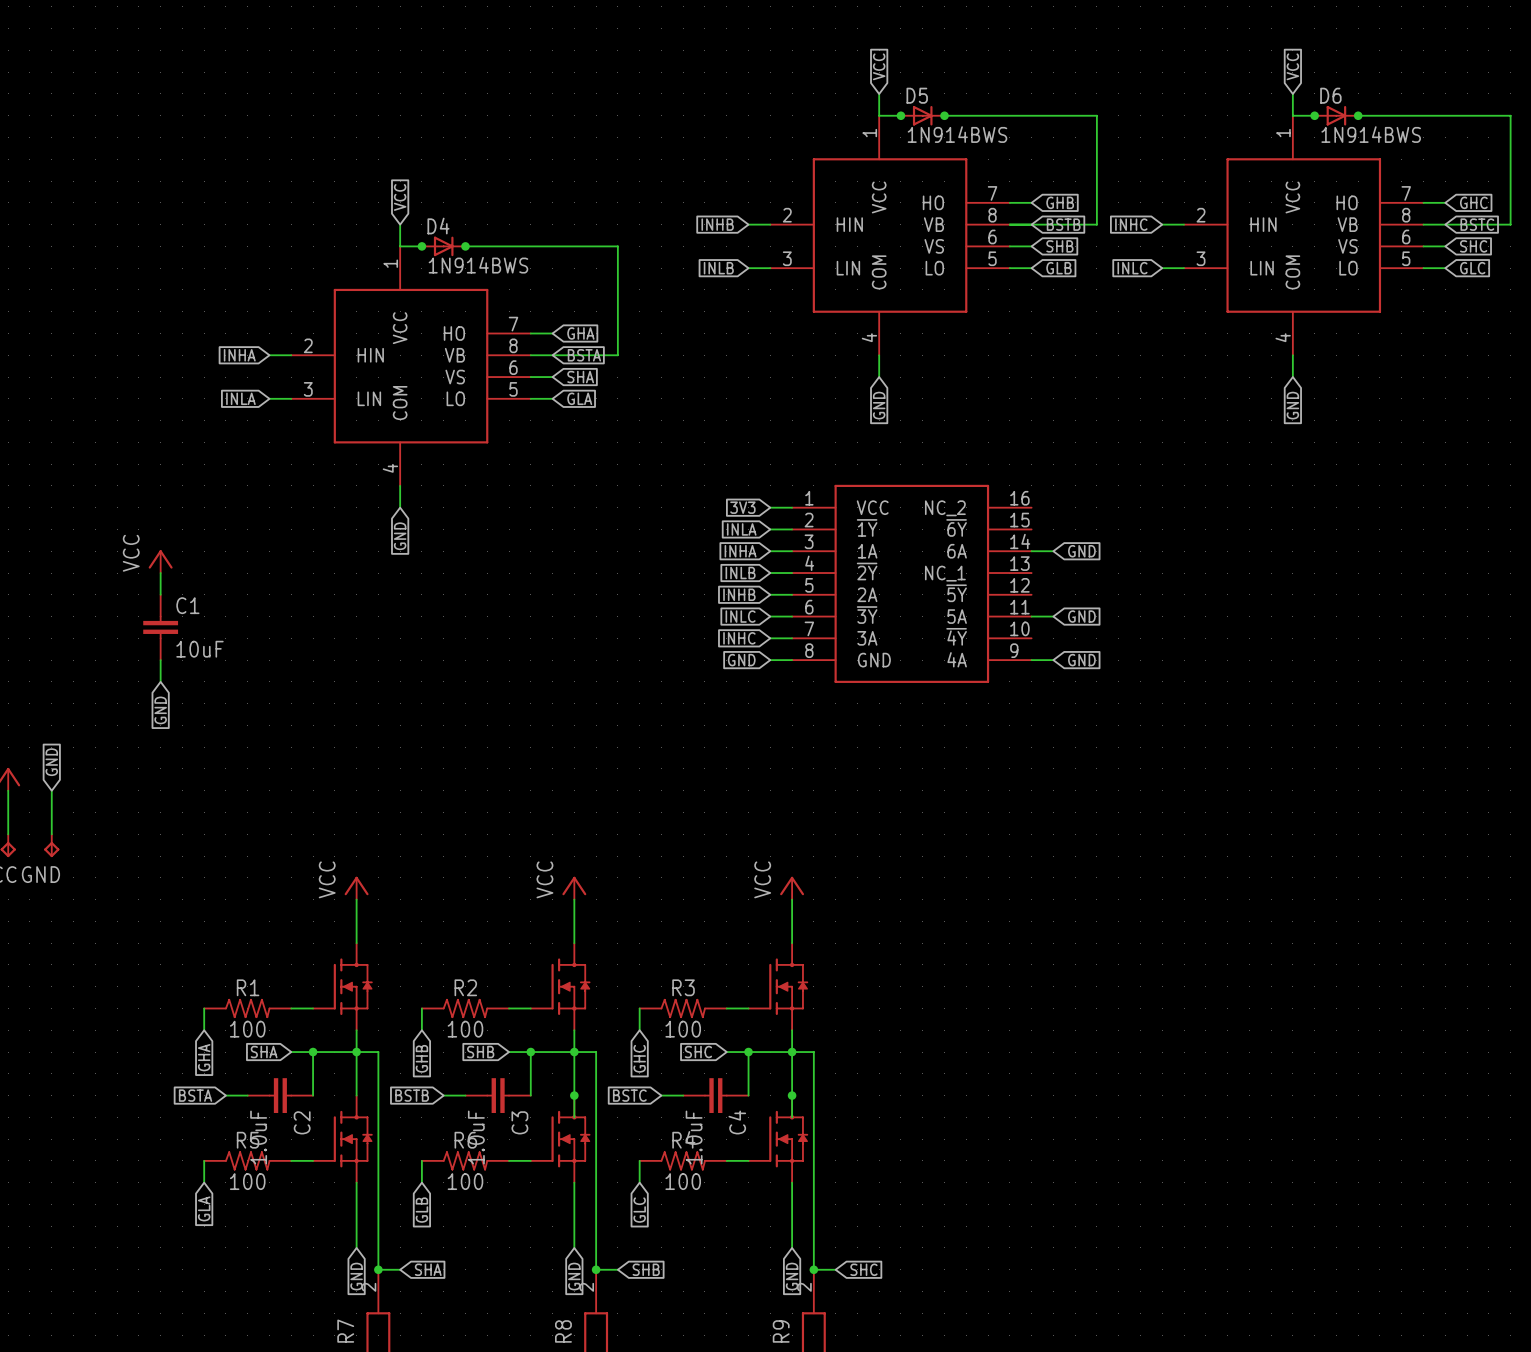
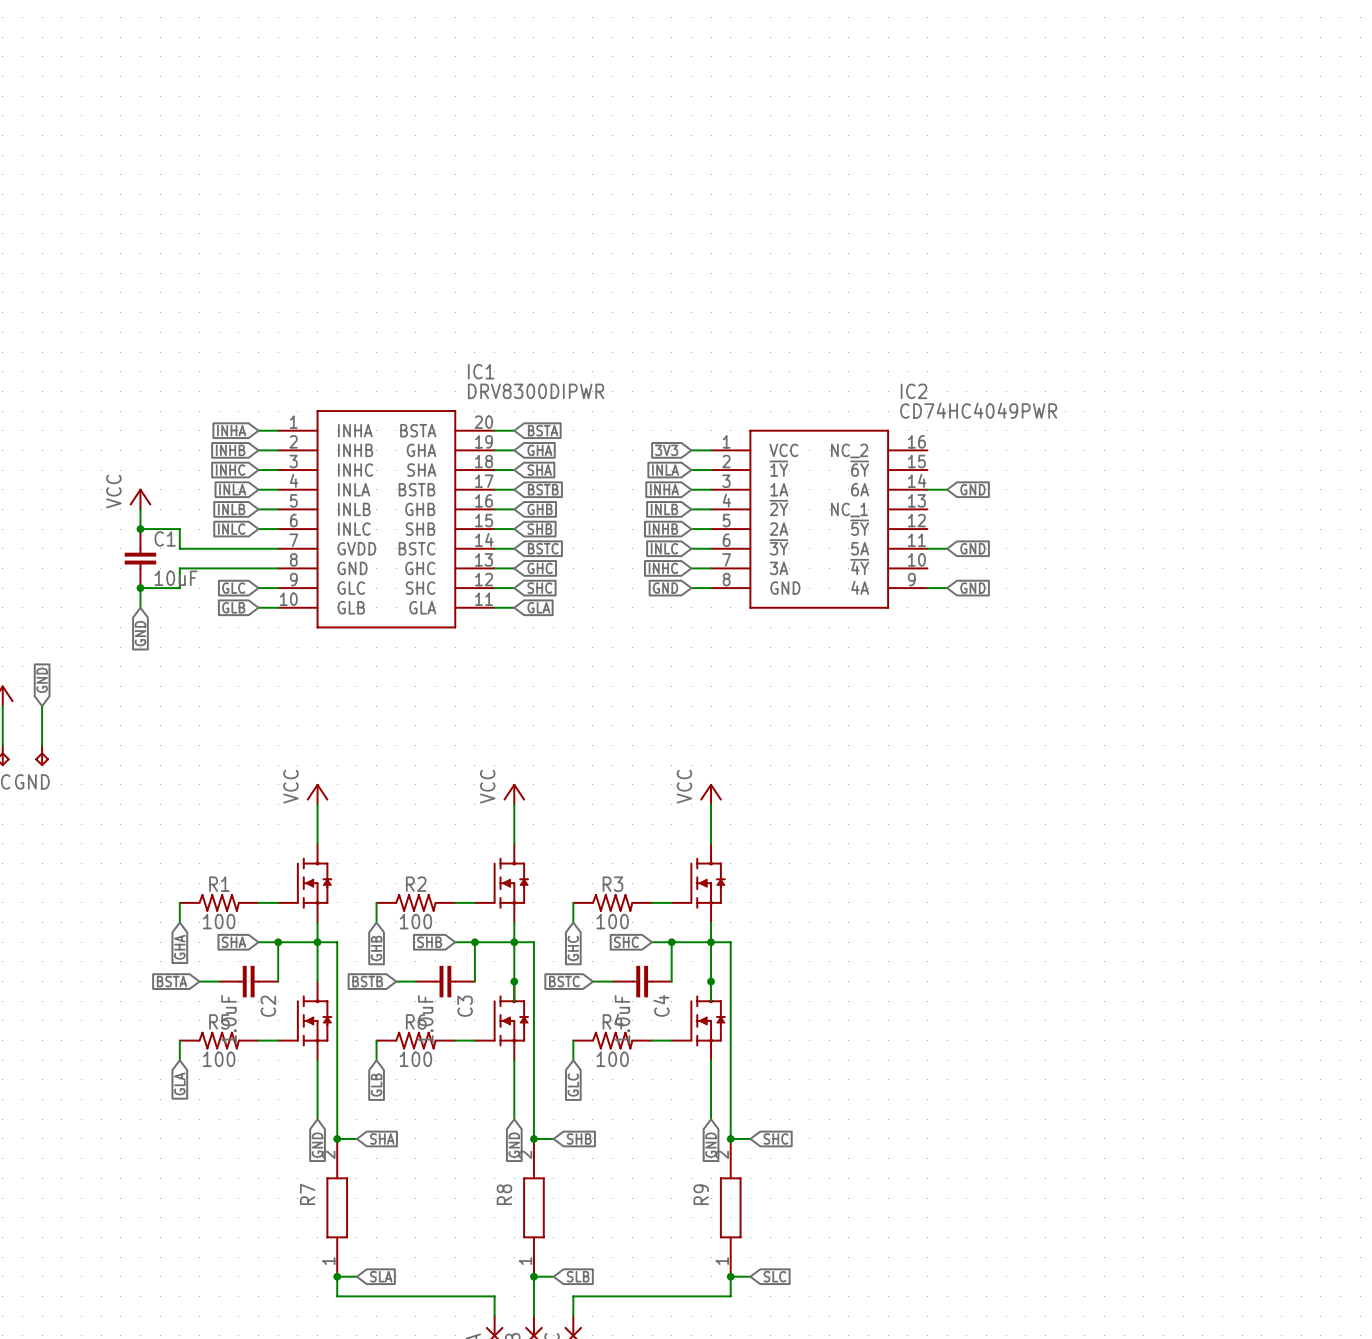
global label: VCC (879, 66) -> none
global label: VCC (1292, 66) -> none
wire: (879, 93) (879, 115) (900, 115) -> none
wire: (1292, 93) (1292, 115) (1314, 115) -> none
junction: (900, 115) -> none
D5: 1N914BWS (922, 115) -> none
wire: (944, 115) (1096, 115) (1096, 224) (1009, 224) -> none
junction: (944, 115) -> none
junction: (1314, 115) -> none
D6: 1N914BWS (1336, 115) -> none
wire: (1358, 115) (1510, 115) (1510, 224) (1423, 224) -> none
junction: (1358, 115) -> none
global label: VCC (400, 197) -> none
wire: (1009, 202) (1031, 202) -> none
global label: GHB (1060, 202) -> none
wire: (1423, 202) (1445, 202) -> none
global label: GHC (1473, 202) -> none
wire: (400, 224) (400, 246) (421, 246) -> none
global label: INHB (717, 224) -> none
wire: (748, 224) (770, 224) -> none
global label: BSTB (1063, 224) -> none
global label: INHC (1131, 224) -> none
wire: (1162, 224) (1184, 224) -> none
global label: BSTC (1477, 224) -> none
part: (890, 235) -> none
part: (1303, 235) -> none
junction: (421, 246) -> none
D4: 1N914BWS (443, 246) -> none
wire: (465, 246) (617, 246) (617, 355) (530, 355) -> none
junction: (465, 246) -> none
wire: (1009, 246) (1031, 246) -> none
global label: SHB (1059, 246) -> none
wire: (1423, 246) (1445, 246) -> none
global label: SHC (1473, 246) -> none
global label: INLB (718, 268) -> none
wire: (748, 268) (770, 268) -> none
wire: (1009, 268) (1031, 268) -> none
global label: GLB (1058, 268) -> none
global label: INLC (1132, 268) -> none
wire: (1162, 268) (1184, 268) -> none
wire: (1423, 268) (1445, 268) -> none
global label: GLC (1472, 268) -> none
wire: (530, 333) (552, 333) -> (494, 430) (514, 430)
global label position: GHA (580, 333) -> GHA (539, 450)
global label position: INHA (239, 355) -> INHA (231, 430)
wire: (269, 355) (291, 355) -> (258, 450) (278, 450)
global label position: BSTA (584, 355) -> BSTA (543, 430)
wire: (879, 355) (879, 377) -> none
wire: (1292, 355) (1292, 377) -> none
part: (411, 366) -> none
wire: (530, 377) (552, 377) -> (494, 470) (514, 470)
global label position: SHA (580, 377) -> SHA (539, 470)
global label position: INLA (240, 398) -> INLA (232, 489)
wire: (269, 398) (291, 398) -> (258, 489) (278, 489)
wire: (530, 398) (552, 398) -> (494, 489) (514, 489)
global label: GLA (579, 398) -> none
global label: GND (879, 405) -> none
global label: GND (1292, 405) -> none
IC2 name: none -> IC2 (914, 391)
IC2 value: none -> CD74HC4049PWR (978, 410)
wire: none -> (258, 430) (278, 430)
wire: (400, 485) (400, 507) -> none
global label: none -> INHB (230, 450)
wire: none -> (494, 450) (514, 450)
global label: none -> INHC (230, 470)
wire: none -> (258, 470) (278, 470)
global label: GND (400, 536) -> none
global label: none -> BSTB (543, 489)
global label: none -> INLB (231, 509)
wire: none -> (258, 509) (278, 509)
wire: none -> (494, 509) (514, 509)
global label: none -> GHB (540, 509)
IC1: none -> DRV8300DIPWR (386, 519)
wire: none -> (140, 529) (179, 529) (179, 548) (278, 548)
junction: none -> (140, 529)
global label: none -> INLC (231, 529)
wire: none -> (258, 529) (278, 529)
wire: none -> (494, 529) (514, 529)
global label: none -> SHB (539, 529)
wire: none -> (494, 548) (514, 548)
global label: none -> BSTC (543, 548)
wire: none -> (278, 568) (179, 568) (179, 588) (140, 588)
wire: none -> (494, 568) (514, 568)
global label: none -> GHC (540, 568)
junction: none -> (140, 588)
global label: none -> GLC (233, 588)
wire: none -> (258, 588) (278, 588)
wire: none -> (494, 588) (514, 588)
global label: none -> SHC (539, 588)
global label: none -> GLB (233, 607)
wire: none -> (258, 607) (278, 607)
wire: none -> (494, 607) (514, 607)
global label: none -> GLA (538, 607)

